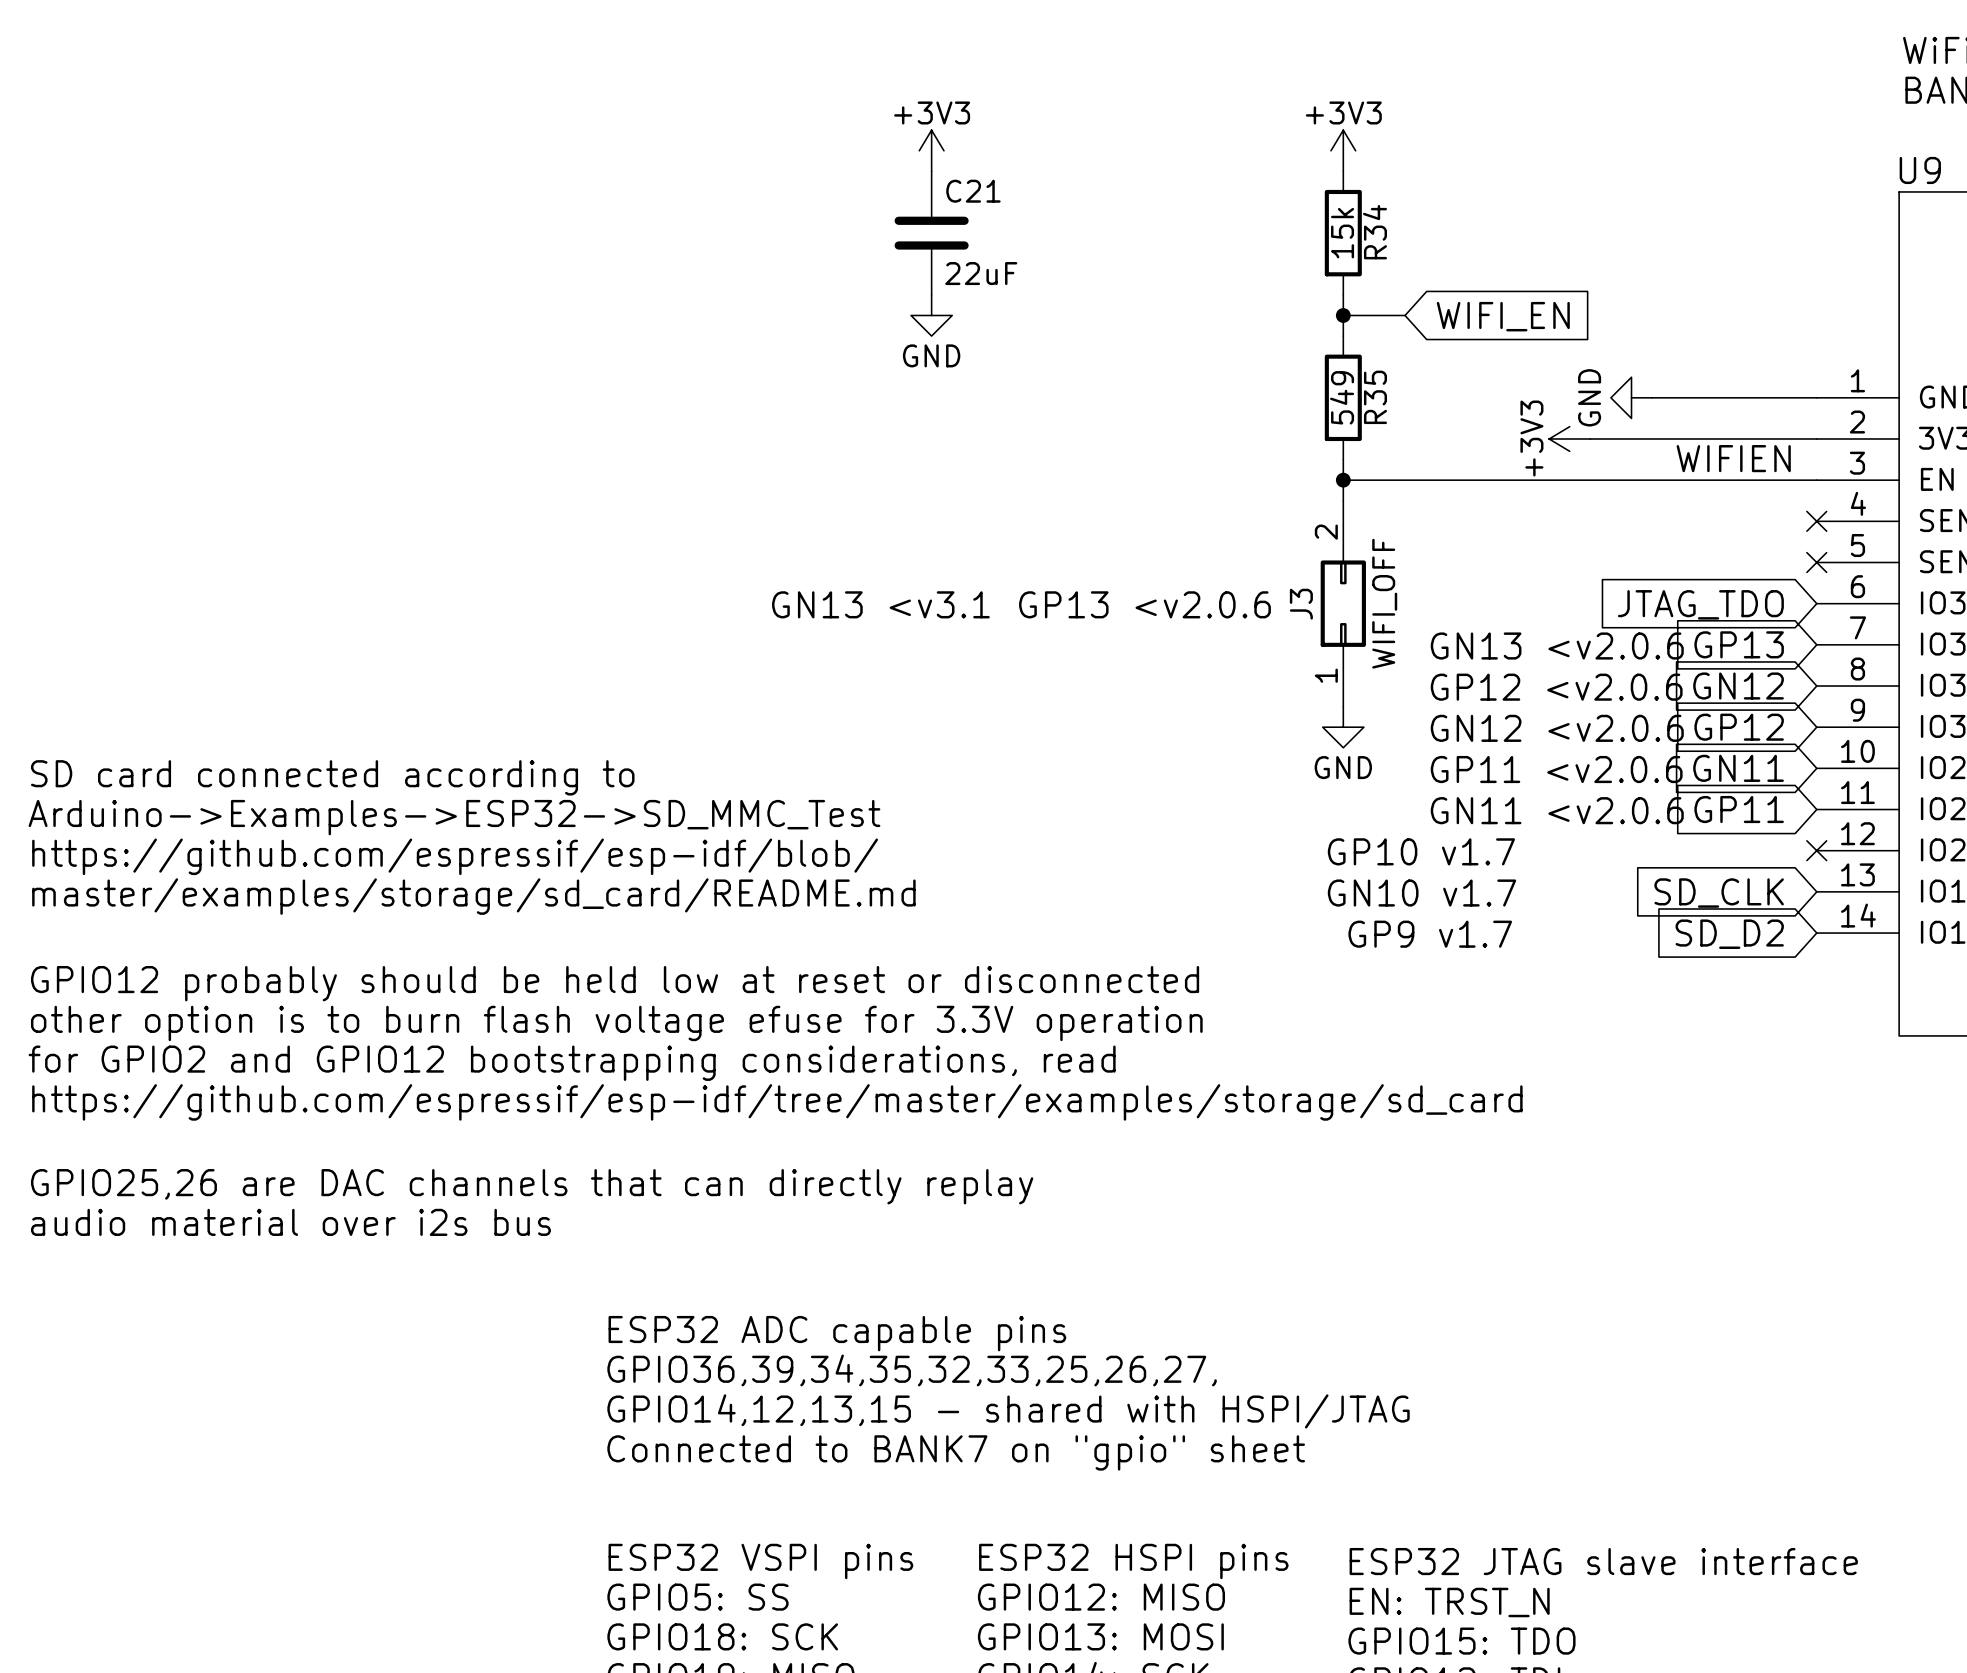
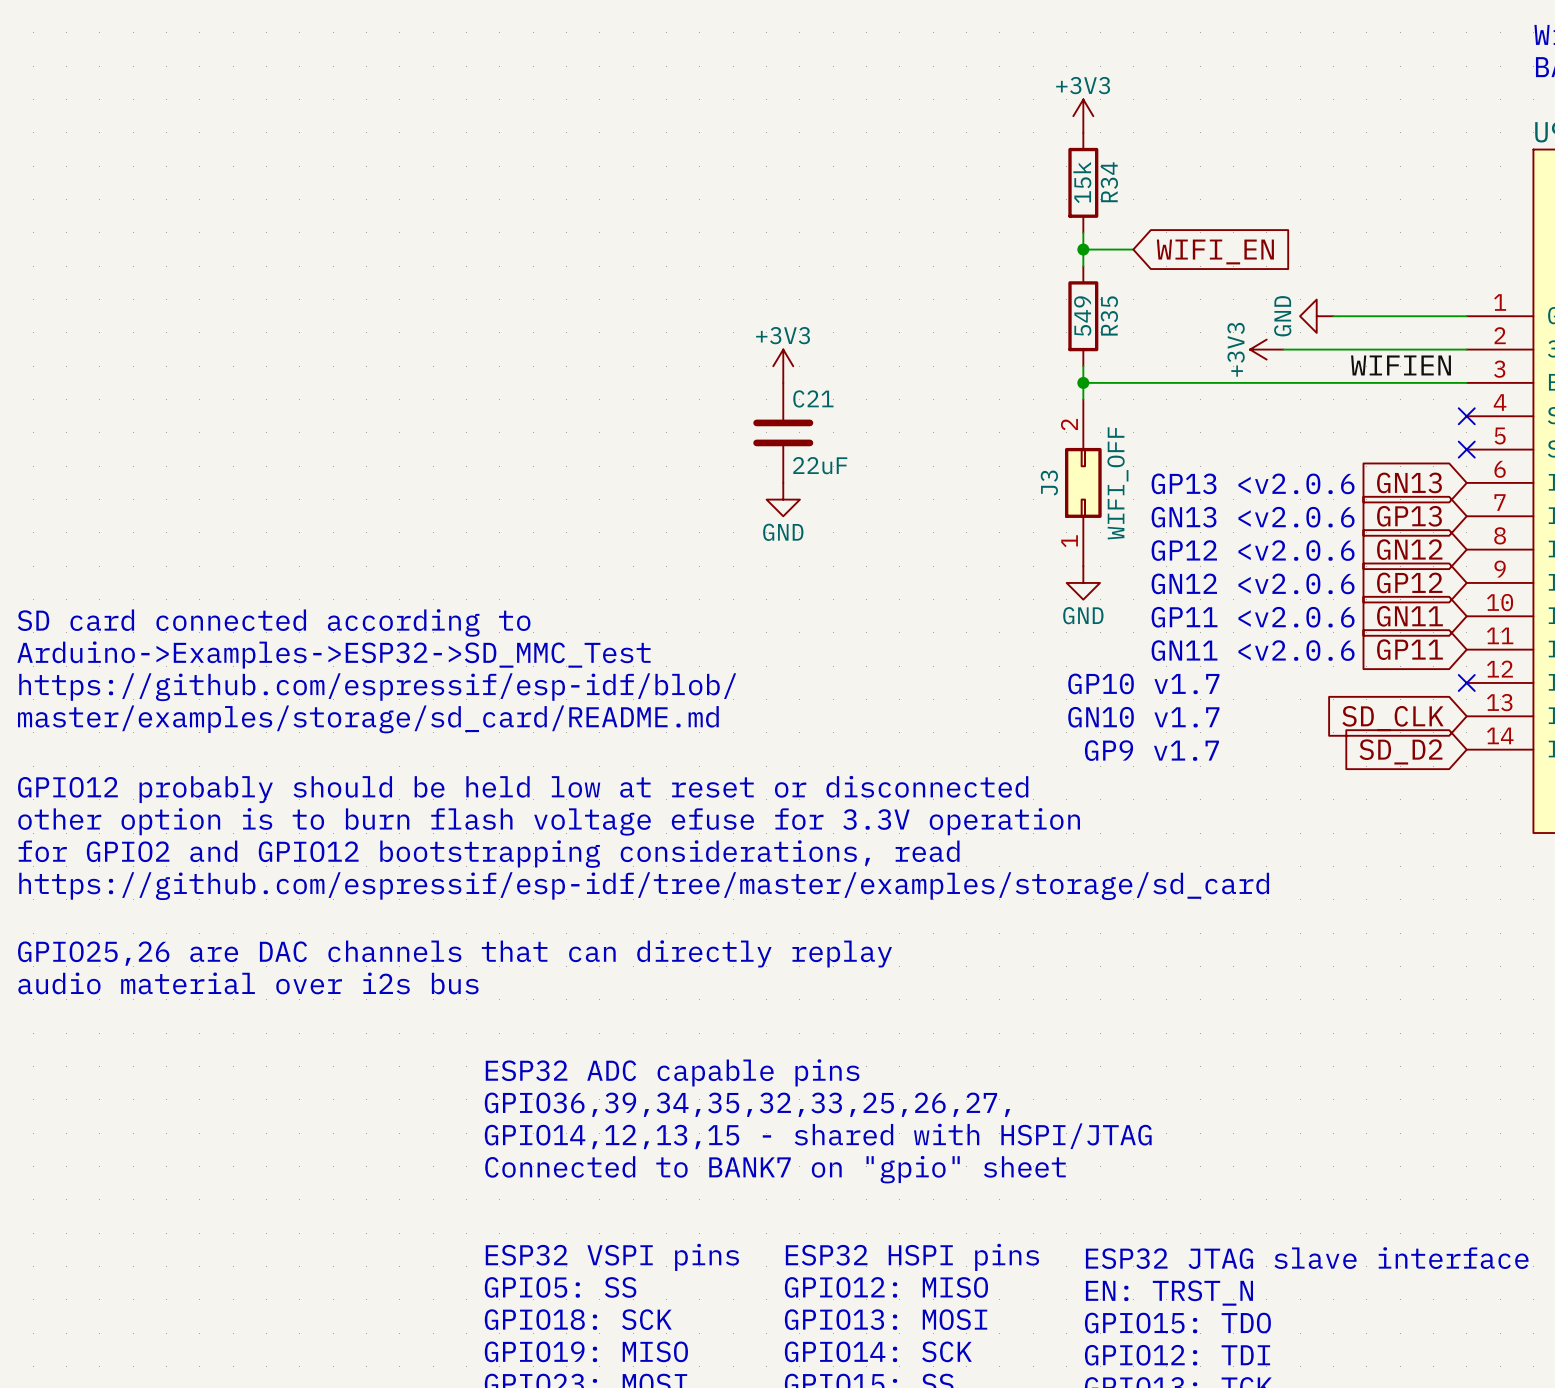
power symbol position: +3V3 (931, 150) -> +3V3 (783, 366)
C21 position: (931, 233) -> (783, 432)
power symbol position: GND (931, 315) -> GND (783, 499)
text: GN13 <v3.1 (880, 604) -> none
text: GP13 <v2.0.6 (1144, 604) -> none
text: none -> GP13 <v2.0.6 (1253, 483)
global label: JTAG_TDO (1700, 604) -> GN13 (1409, 482)

